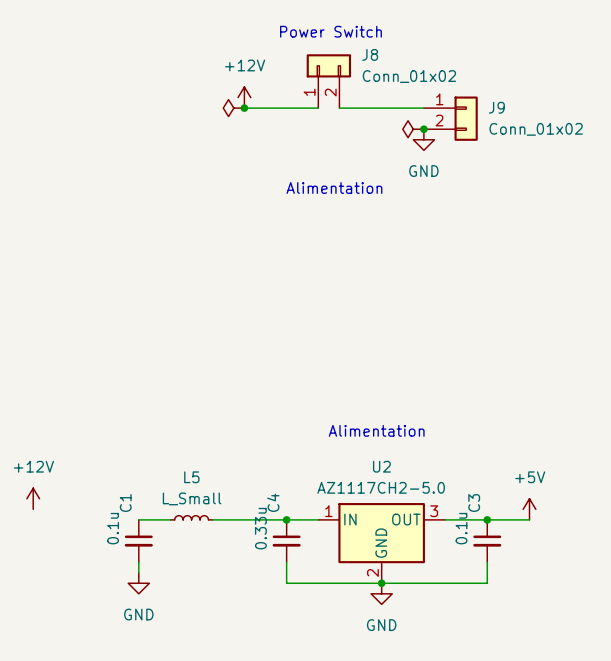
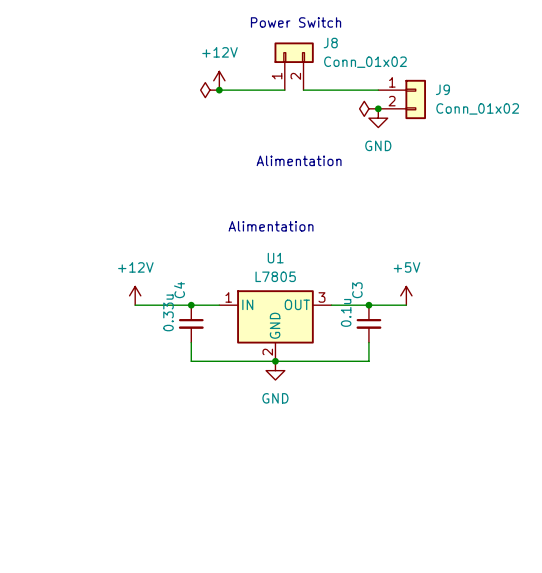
wire: none -> (135, 305) (219, 305)
junction: none -> (191, 305)
junction: none -> (368, 305)
U1: none -> L7805 (275, 325)
junction: none -> (275, 361)
power symbol: none -> GND (275, 370)
text position: Alimentation (376, 430) -> Alimentation (271, 226)
power symbol position: +12V (33, 498) -> +12V (135, 295)
power symbol position: +5V (529, 509) -> +5V (406, 295)
L5: L_Small (191, 517) -> none
wire: (138, 519) (170, 519) -> none
wire: (212, 519) (318, 519) -> none
junction: (286, 519) -> none
wire: (445, 519) (529, 519) -> (331, 305) (406, 305)
junction: (487, 519) -> none
C1: 0.1u (138, 541) -> none
C4 position: (286, 541) -> (191, 323)
C3 position: (487, 541) -> (368, 323)
U2: AZ1117CH2-5.0 (381, 543) -> none
wire: (138, 562) (138, 572) -> none
wire: (286, 562) (286, 583) (487, 583) (487, 562) -> (191, 342) (191, 361) (368, 361) (368, 342)
power symbol: GND (138, 583) -> none
junction: (381, 583) -> none
power symbol: GND (381, 593) -> none

